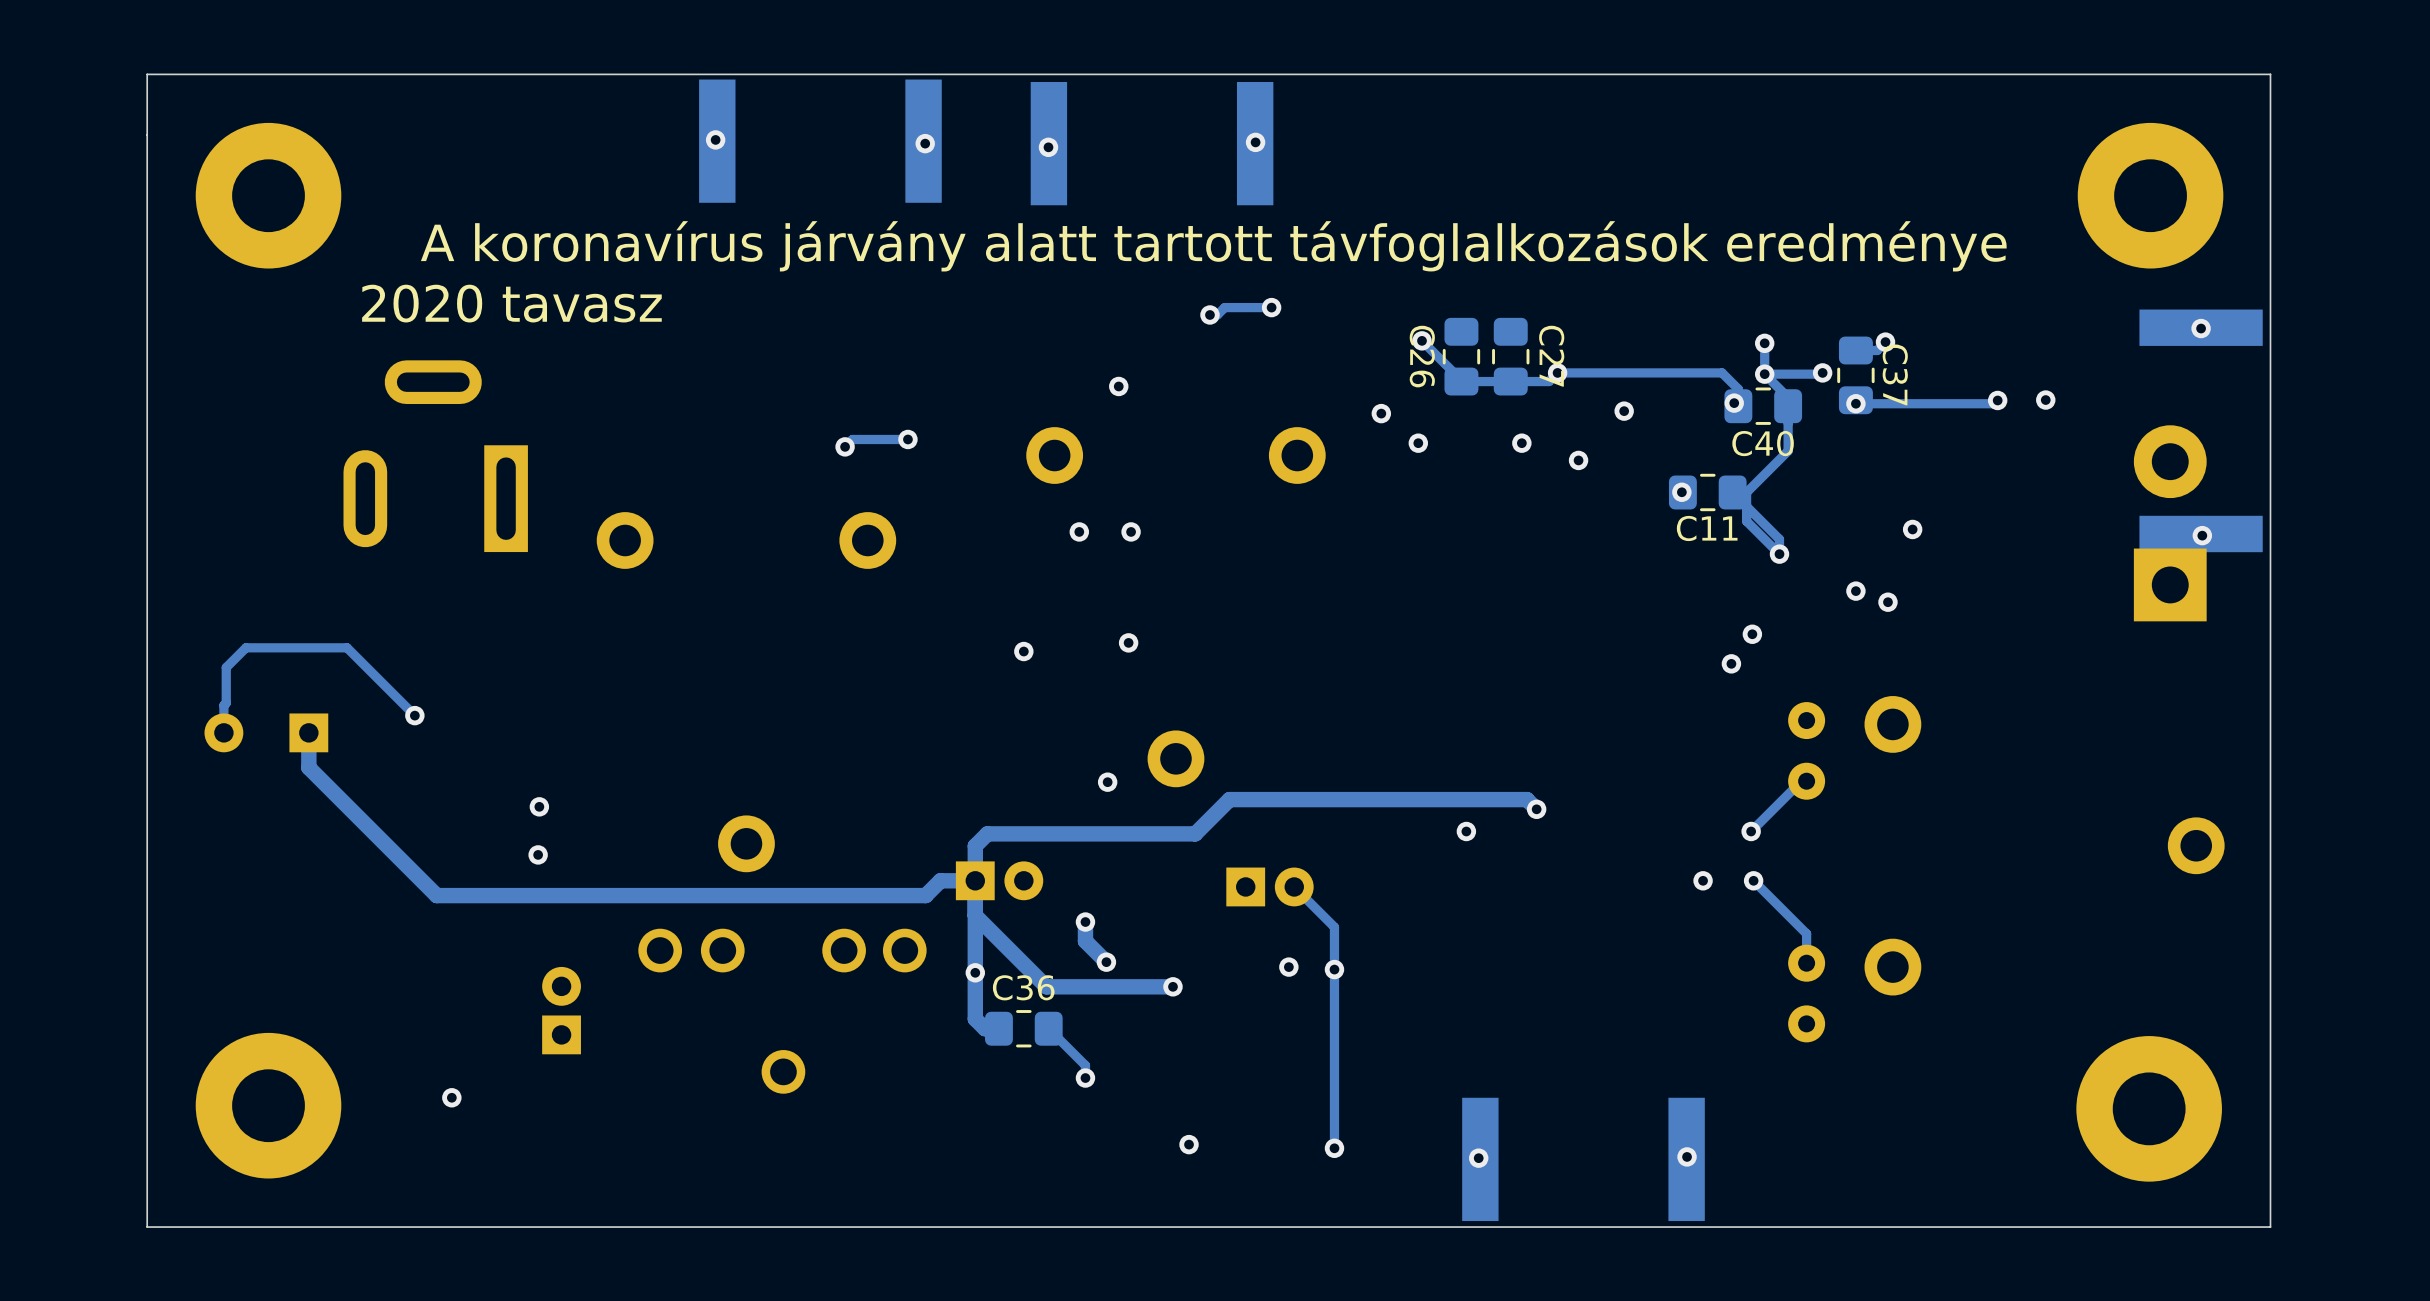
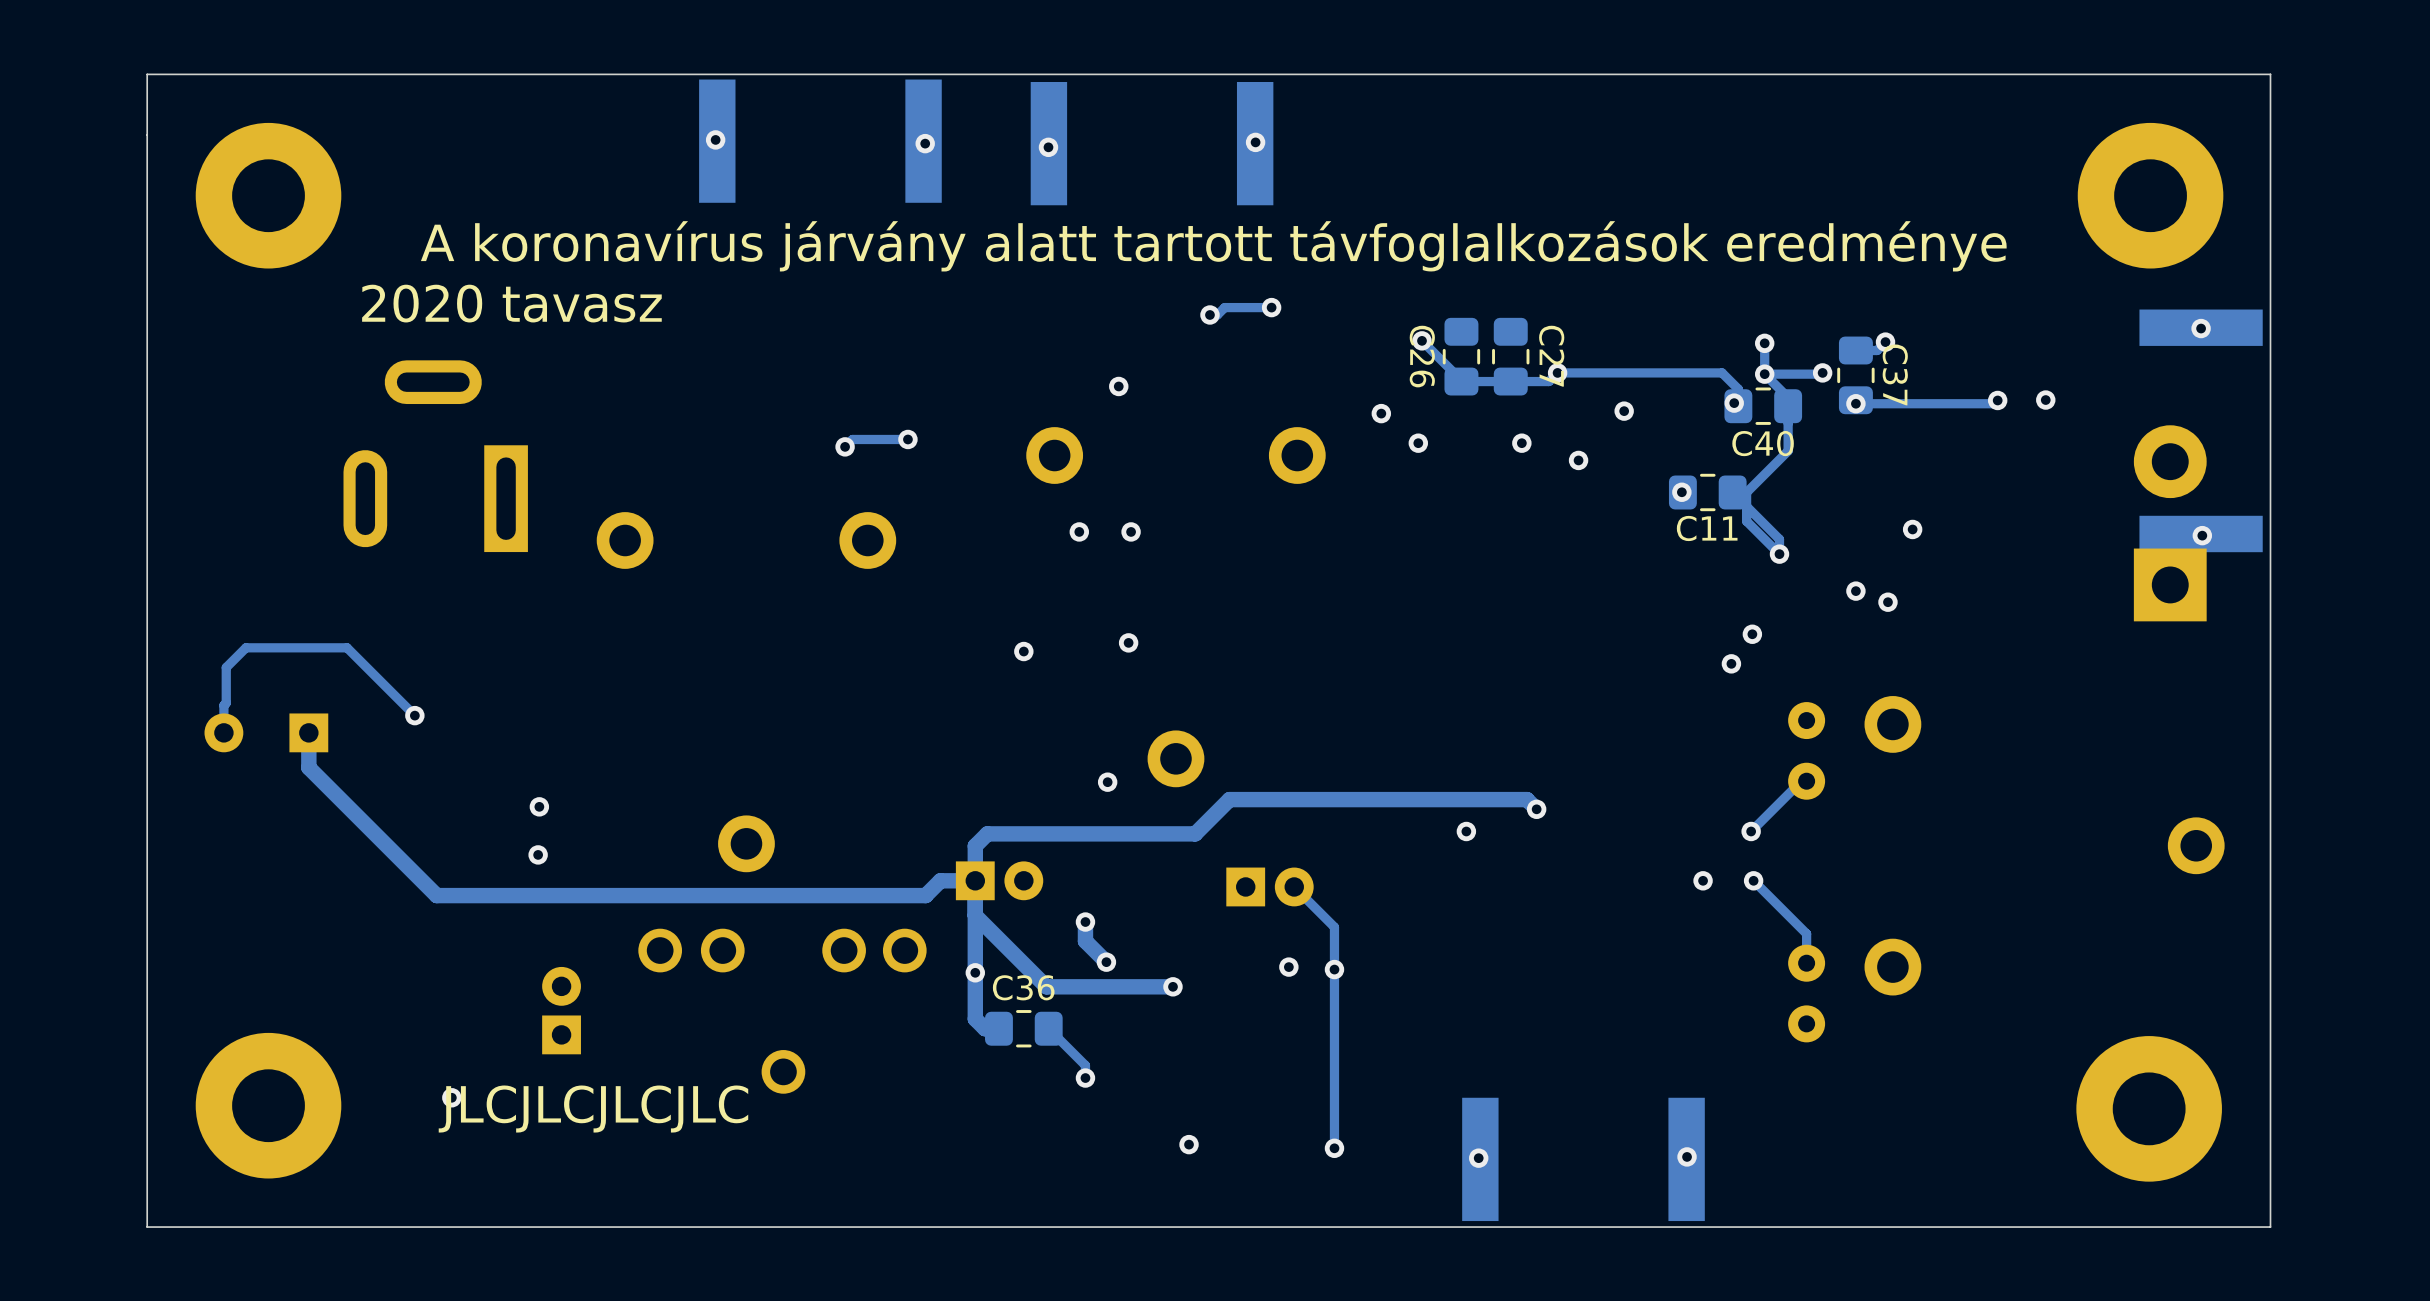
text: none -> JLCJLCJLCJLC (593, 1109)

